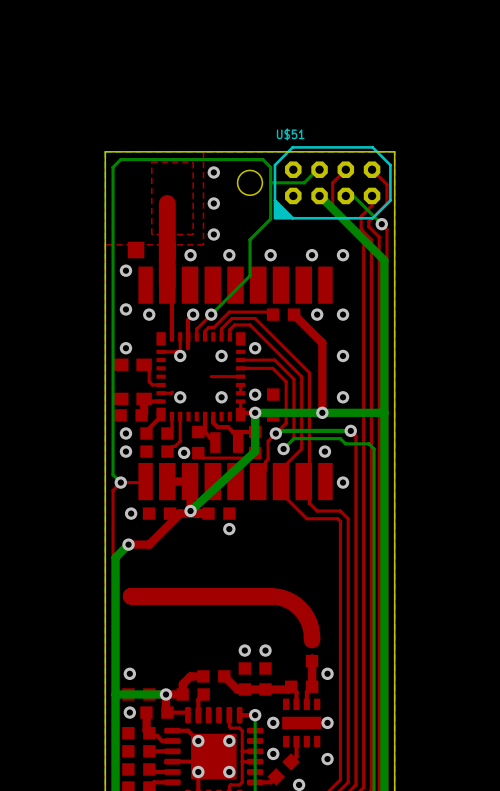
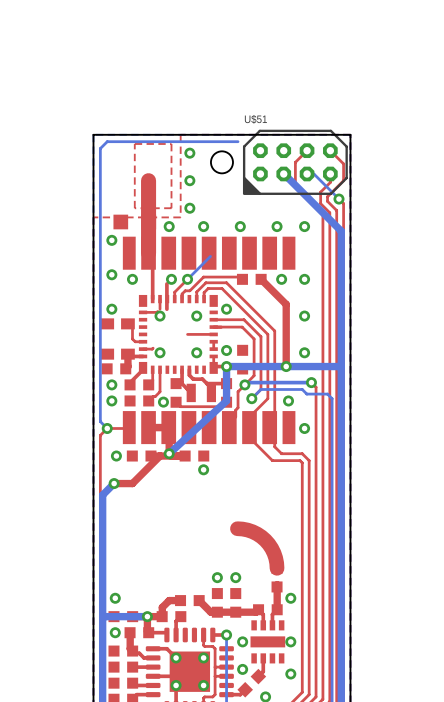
bottom track: (262, 159) (270, 167) (270, 219) (249, 239) (249, 275) (237, 288) -> (233, 141) (238, 141)
bottom track: (319, 169) (304, 182) (270, 182) -> none
top track: (131, 596) (281, 597) (291, 601) (303, 612) (310, 626) (312, 640) -> (237, 528) (252, 531) (265, 540) (274, 553) (277, 568)

